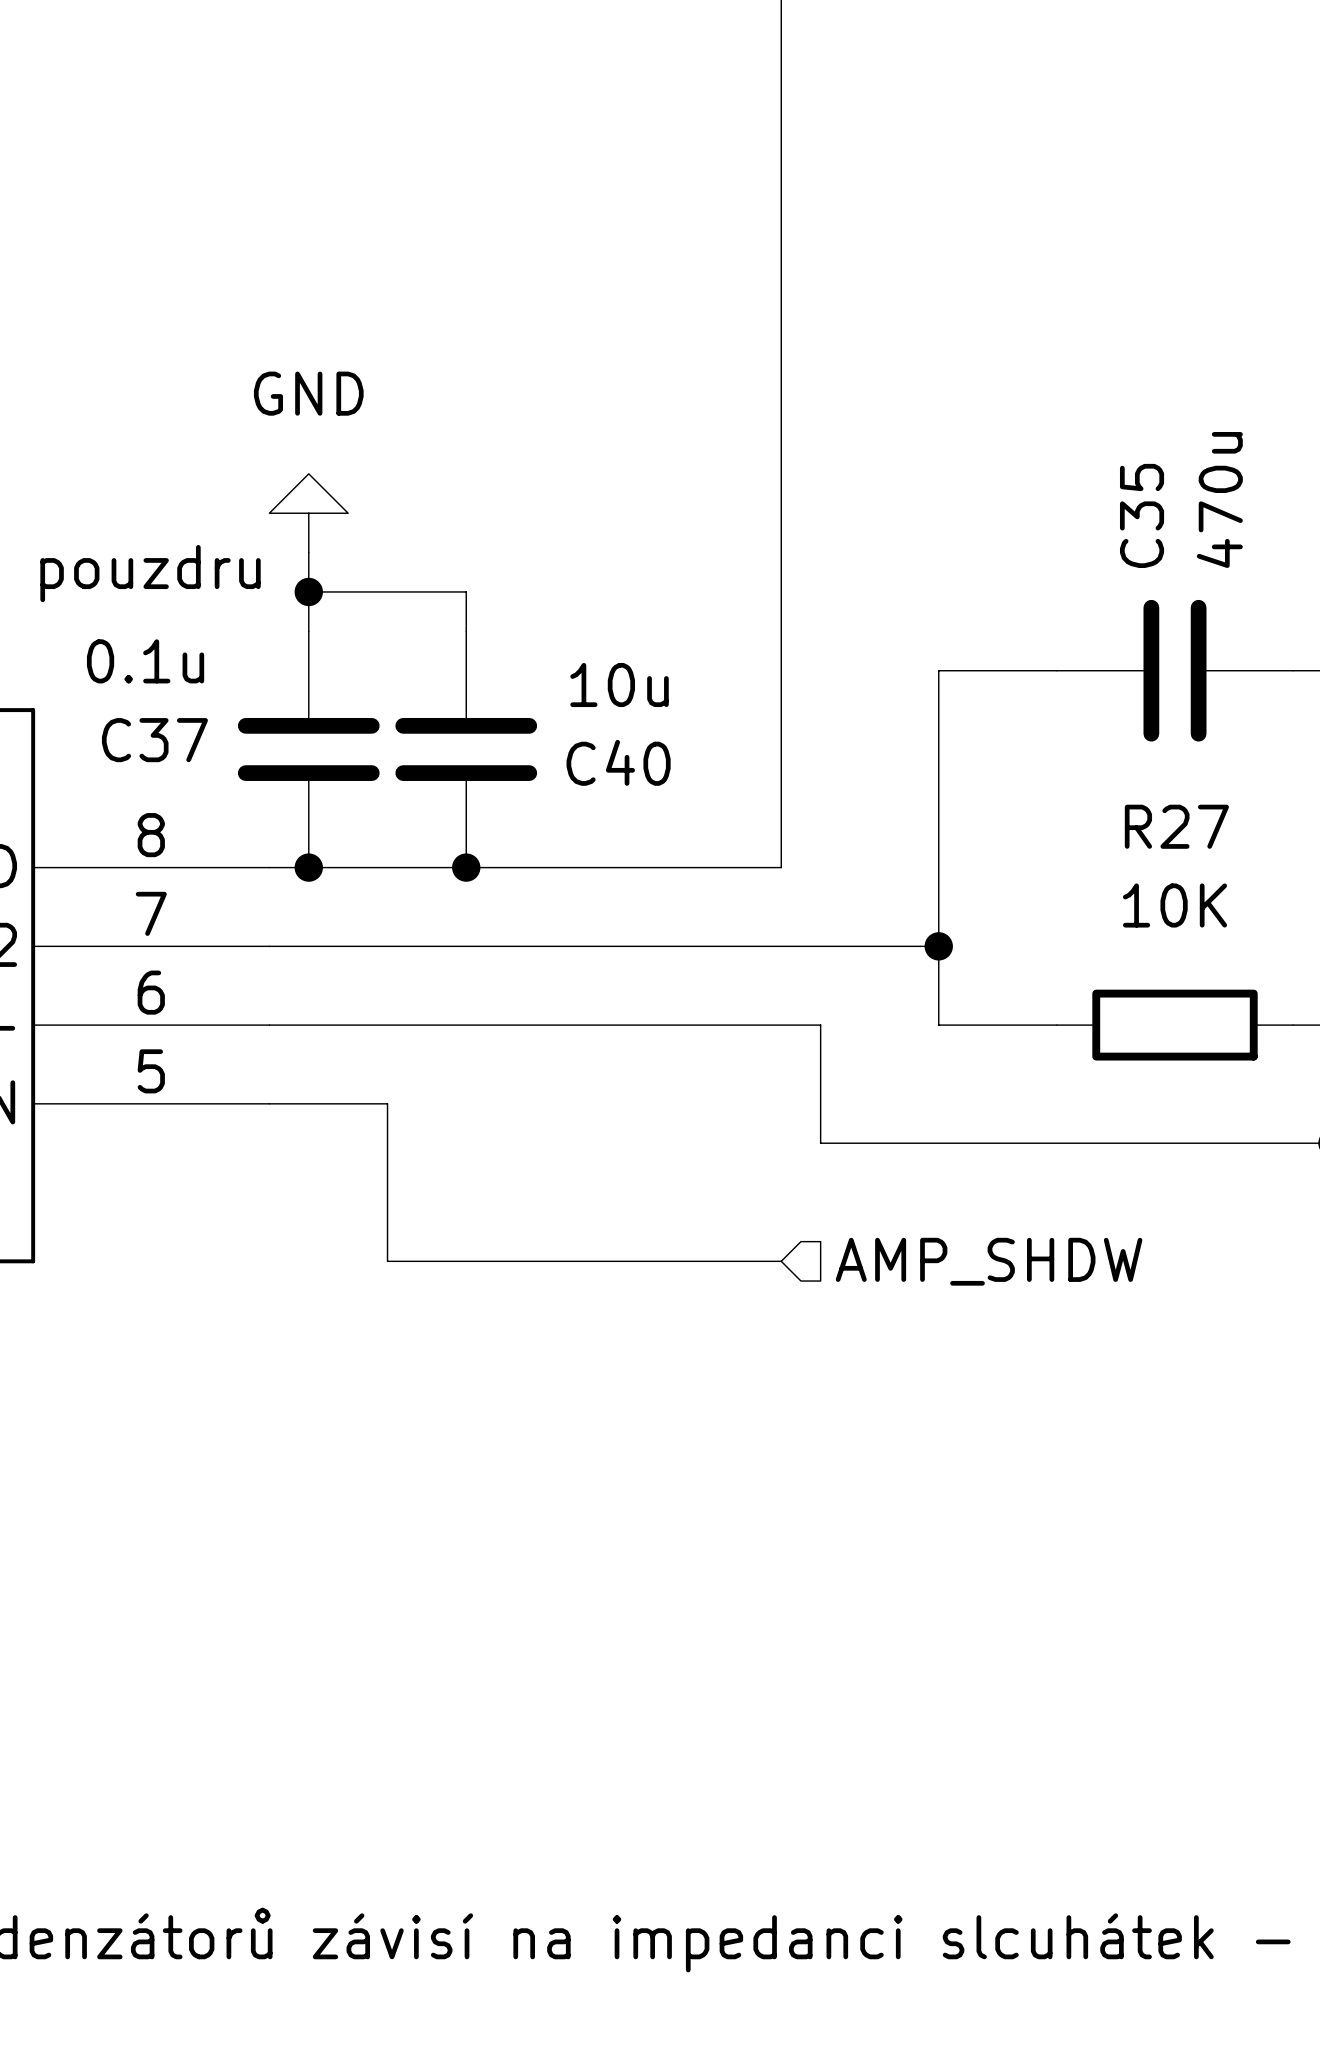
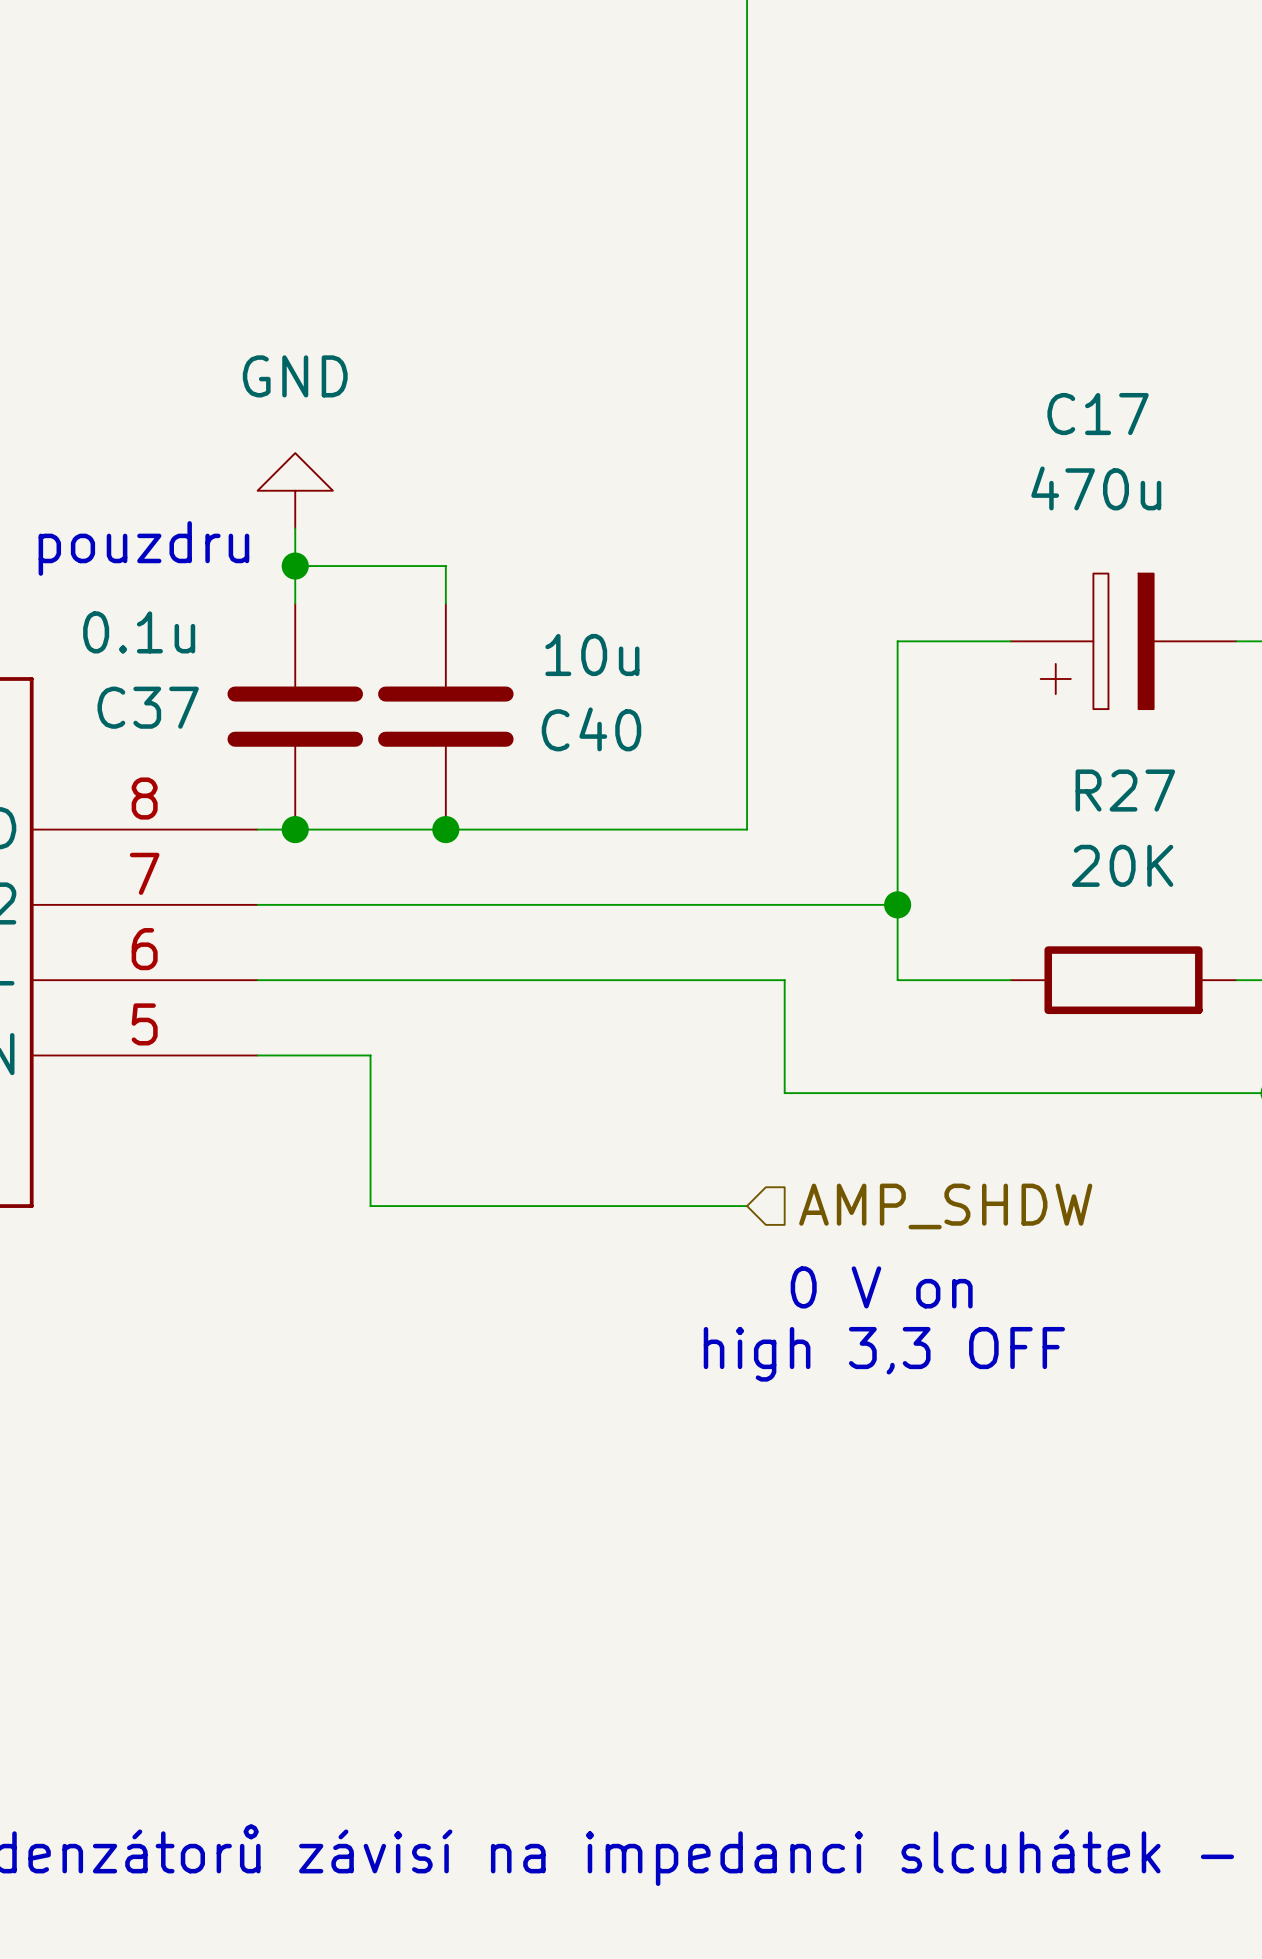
C35: 470u (1175, 670) -> none
C17: none -> 470u (1123, 641)
R27 value: 10K (1175, 905) -> 20K (1122, 865)
text: none -> 0 V on (881, 1287)
text: none -> high 3,3 OFF (884, 1354)

